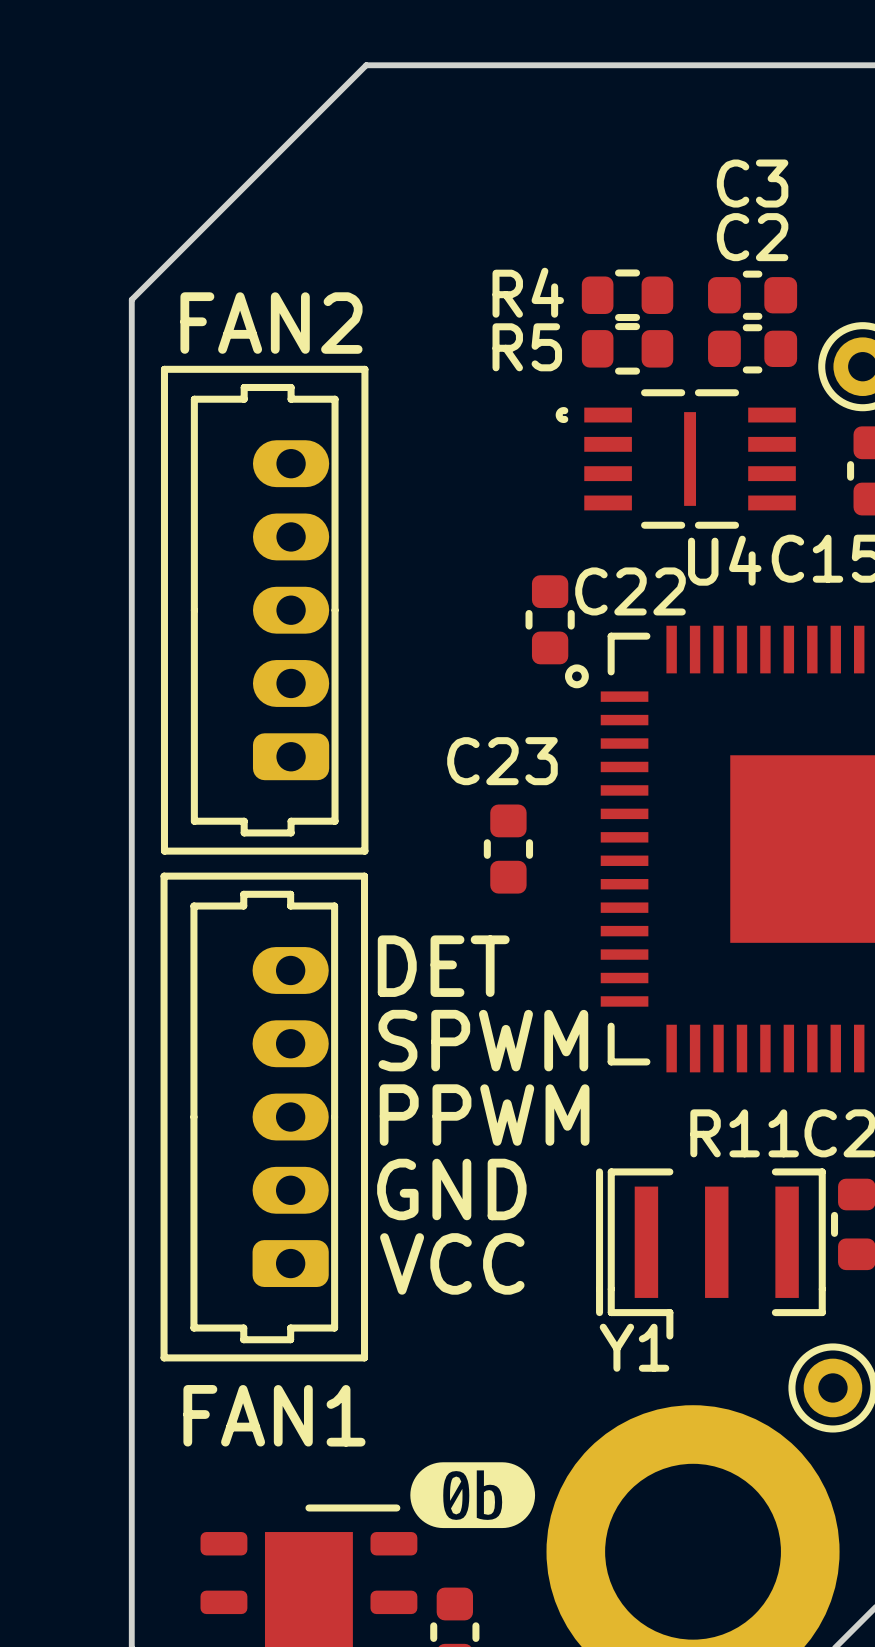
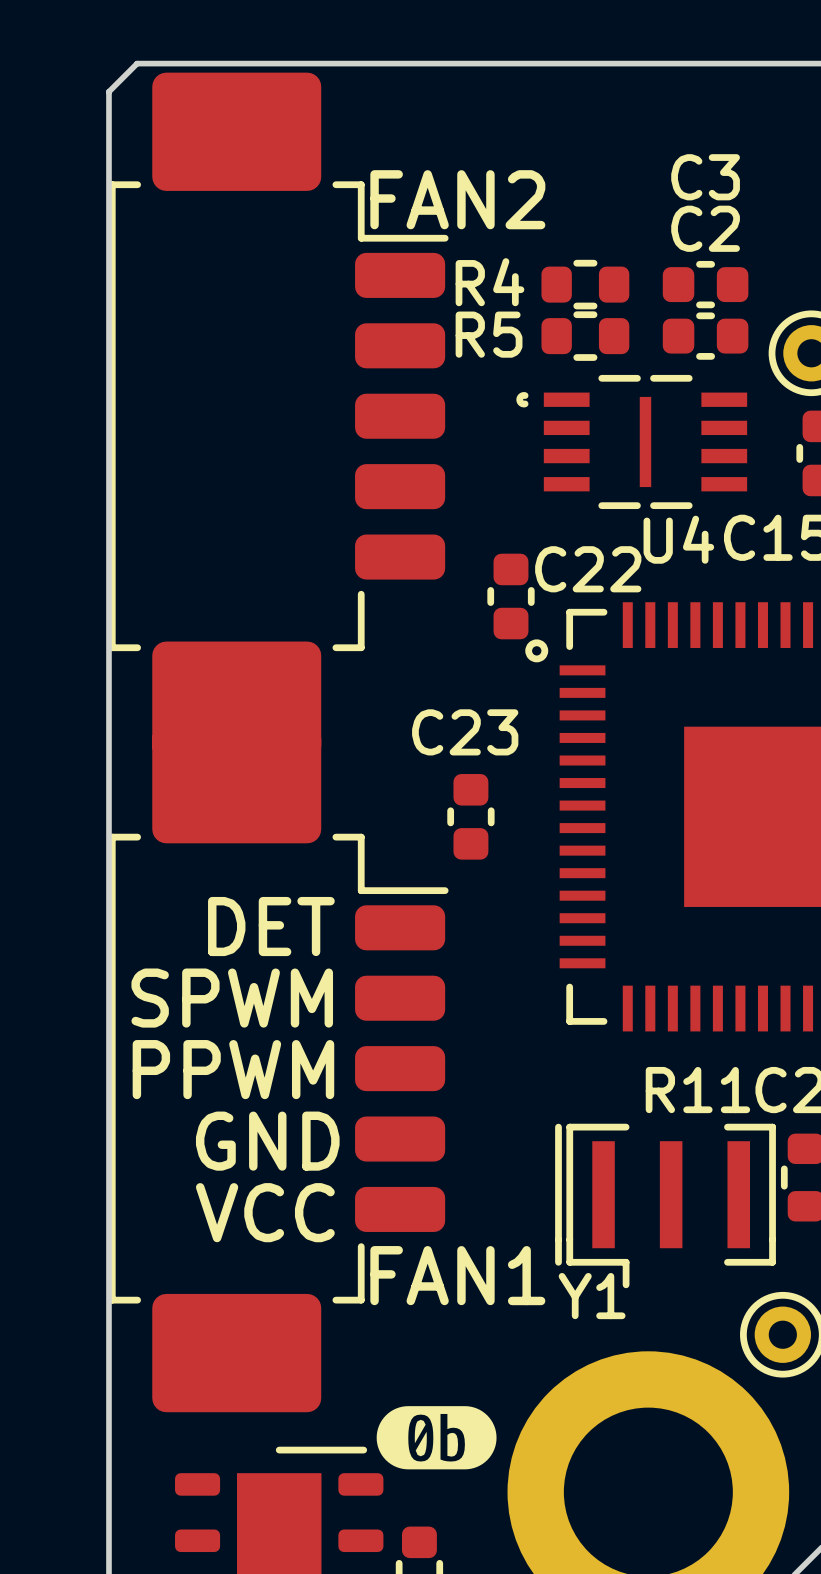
board edge: (366, 65) (131, 299) -> (334, 63) (137, 63) (108, 91) (108, 288)
text position: FAN2 (271, 323) -> FAN2 (457, 199)
part: none -> (278, 416)
part: (264, 610) -> none
part footprint: [160, 872, 369, 1362] -> [108, 725, 449, 1413]
text position: DET (443, 966) -> DET (271, 926)
text position: SPWM (483, 1040) -> SPWM (232, 998)
text position: PPWM (484, 1115) -> PPWM (233, 1069)
text position: GND (451, 1189) -> GND (267, 1141)
text position: VCC (452, 1263) -> VCC (265, 1212)
text position: FAN1 (274, 1415) -> FAN1 (457, 1275)

